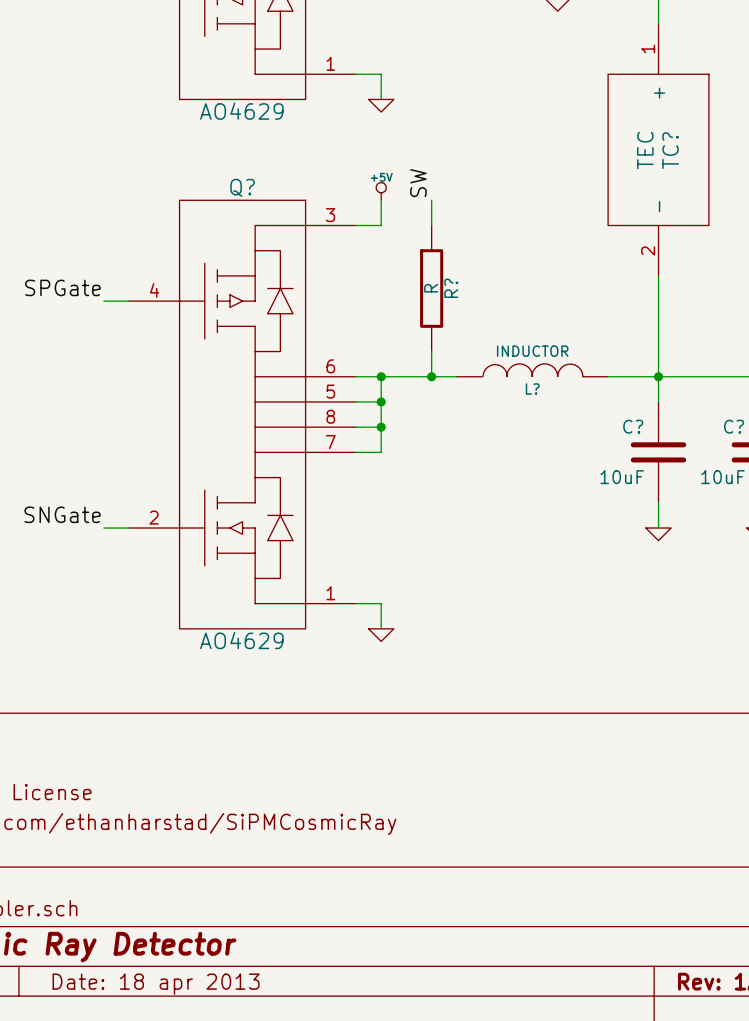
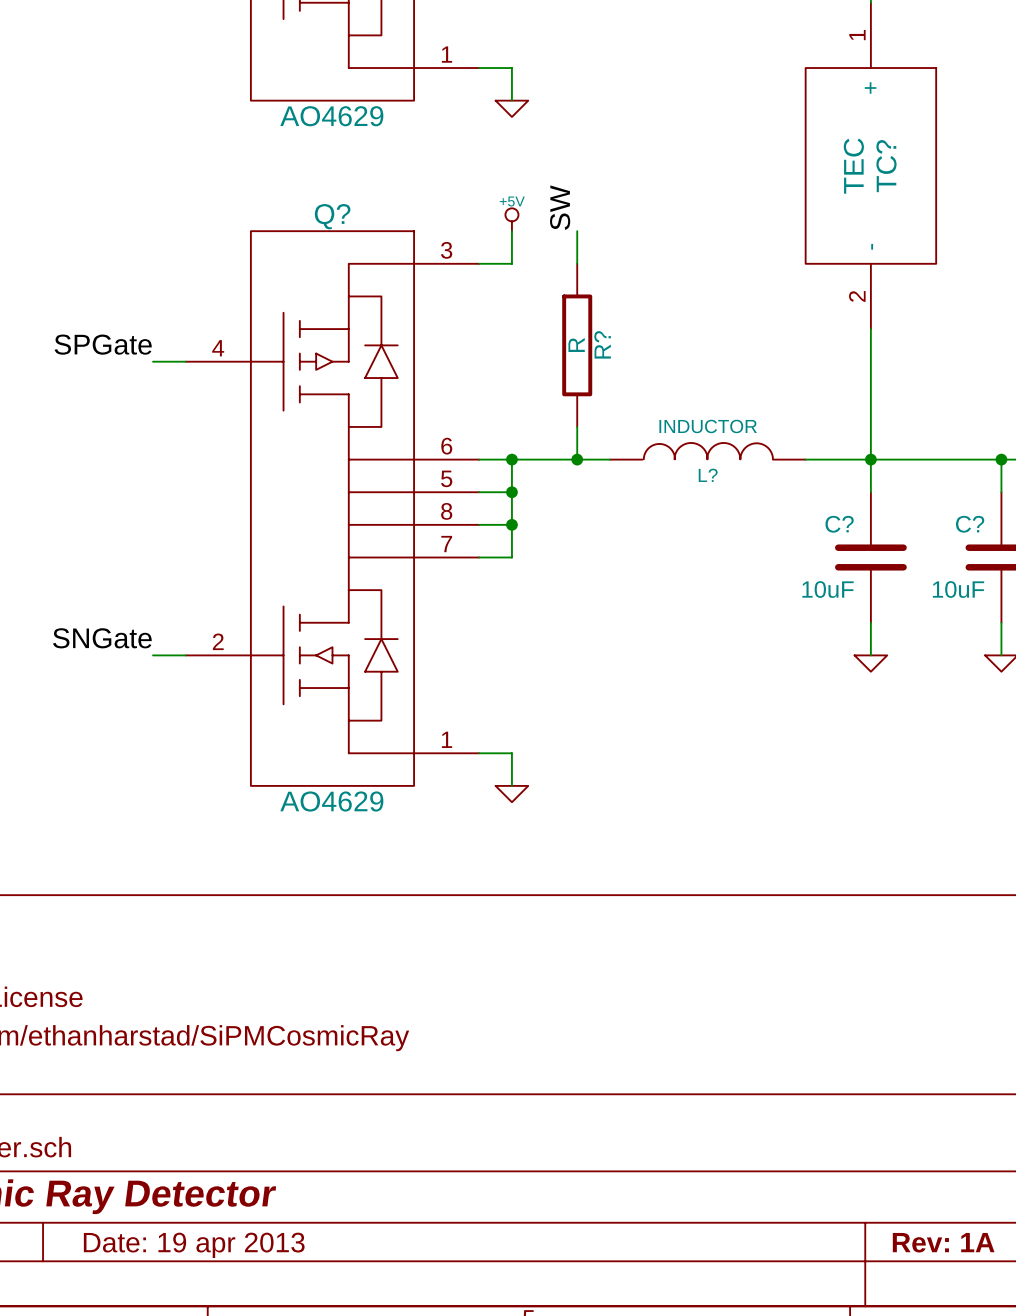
title block: Date: 18 apr 2013 (156, 984) -> Date: 19 apr 2013 (194, 1245)

